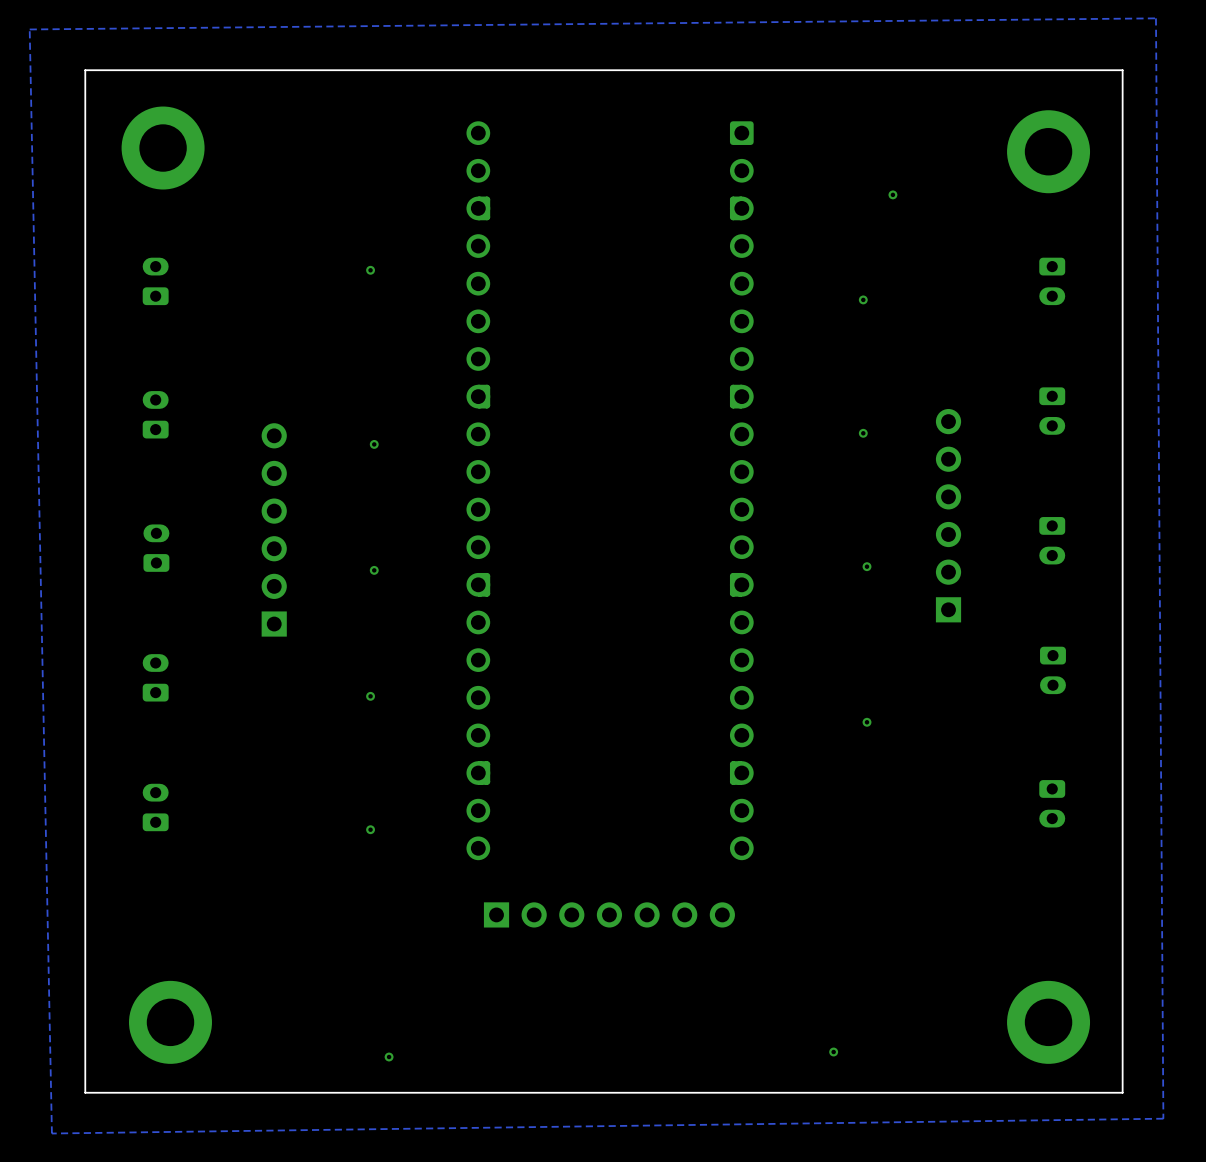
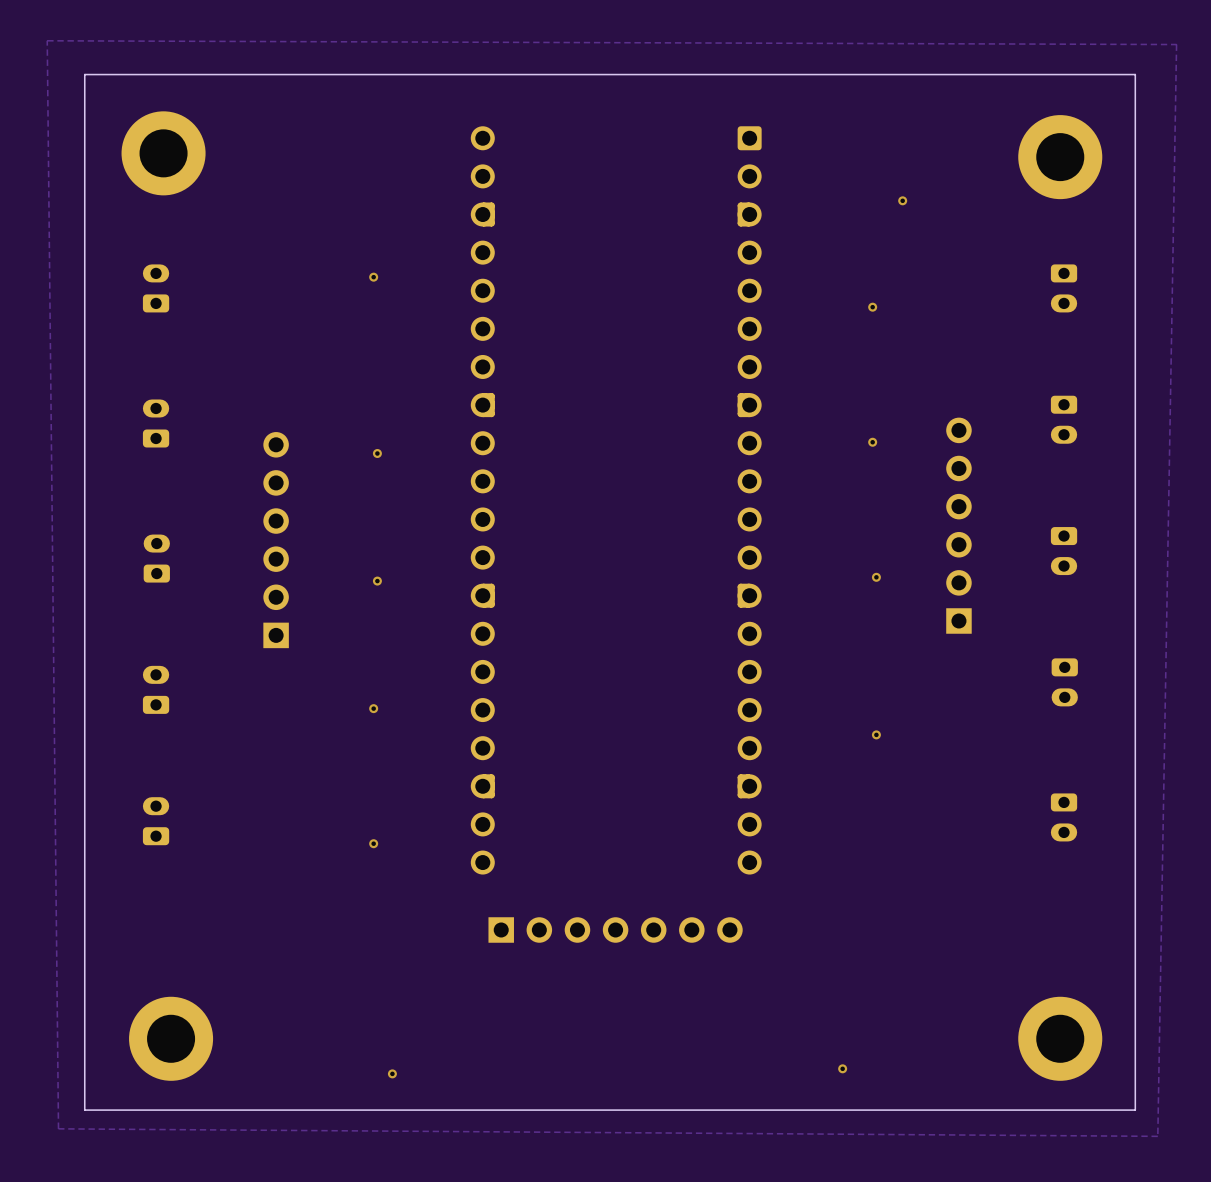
zone outline: (1155, 18) (1163, 1118) (51, 1133) (29, 29) (1155, 18) -> (47, 40) (1176, 44) (1157, 1136) (58, 1128) (47, 40)

